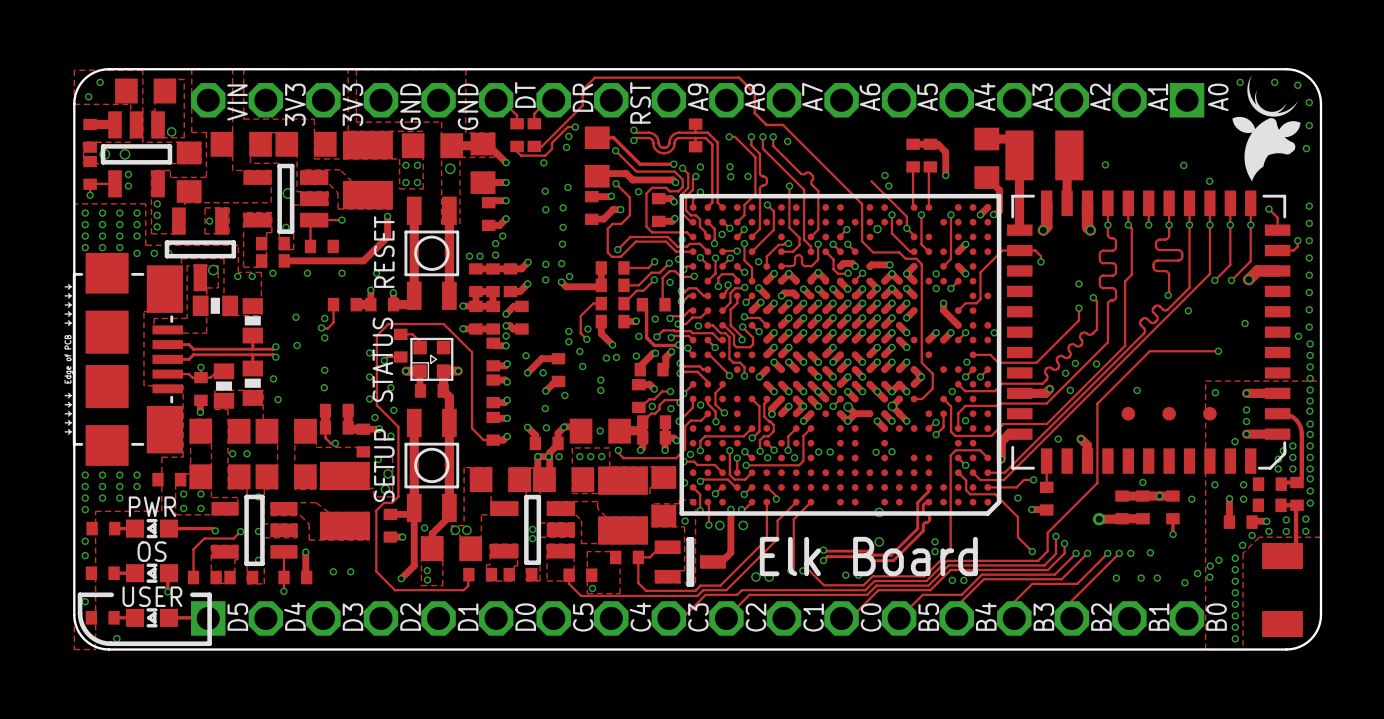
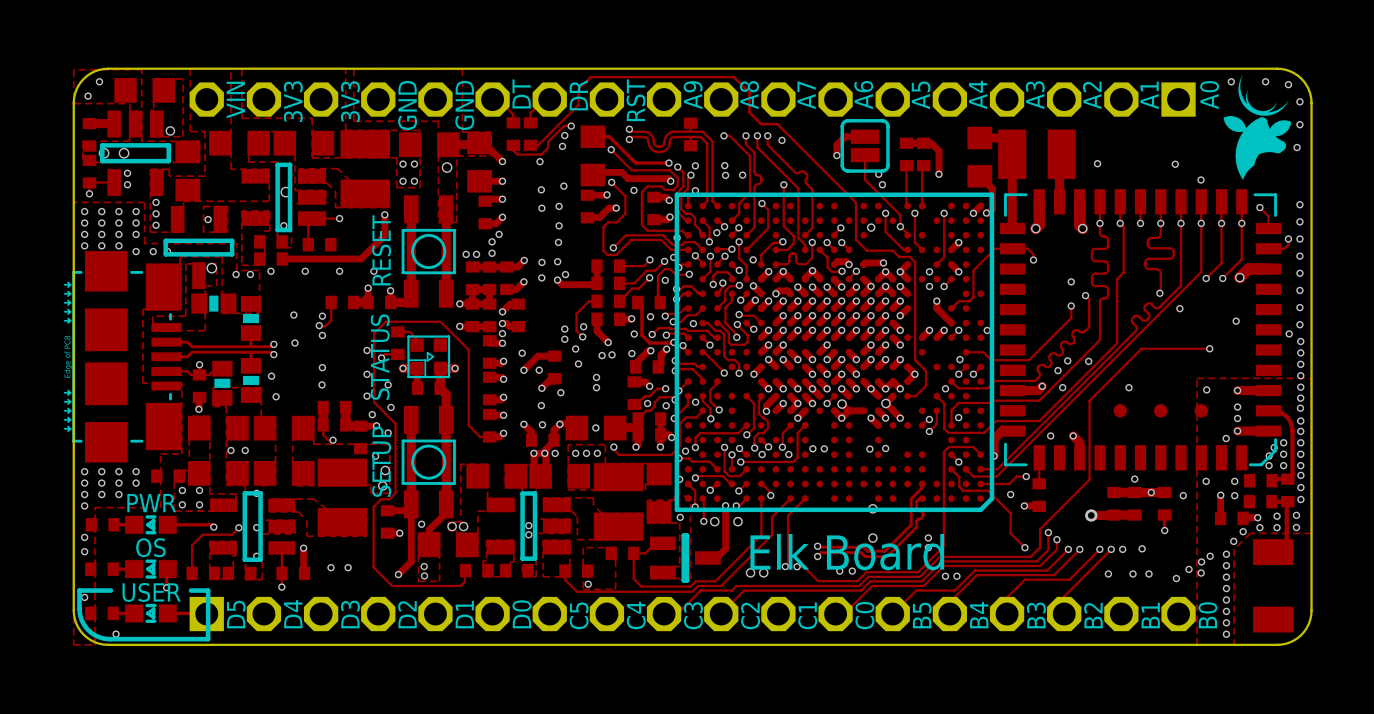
track: none -> (865, 136) (845, 136) (836, 144) (836, 155)
part: none -> (865, 145)
via: none -> (836, 155)
track: none -> (865, 155) (865, 179)

